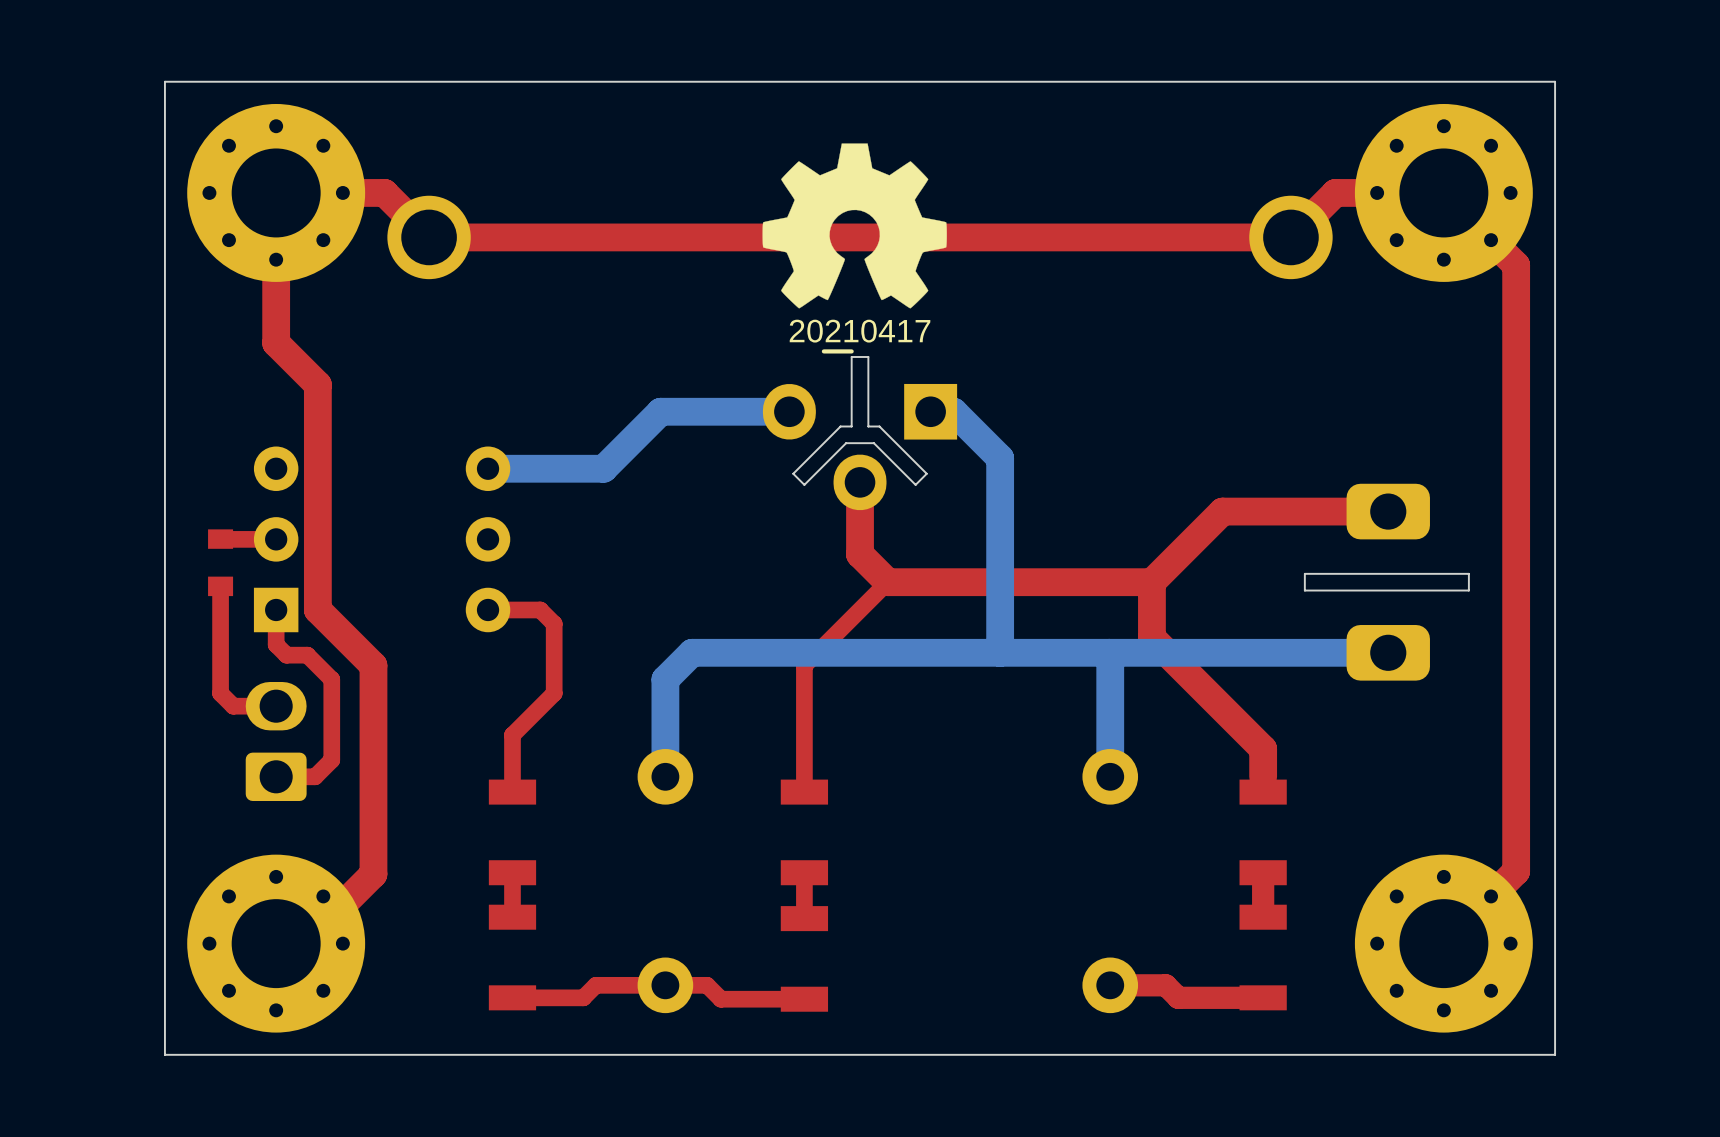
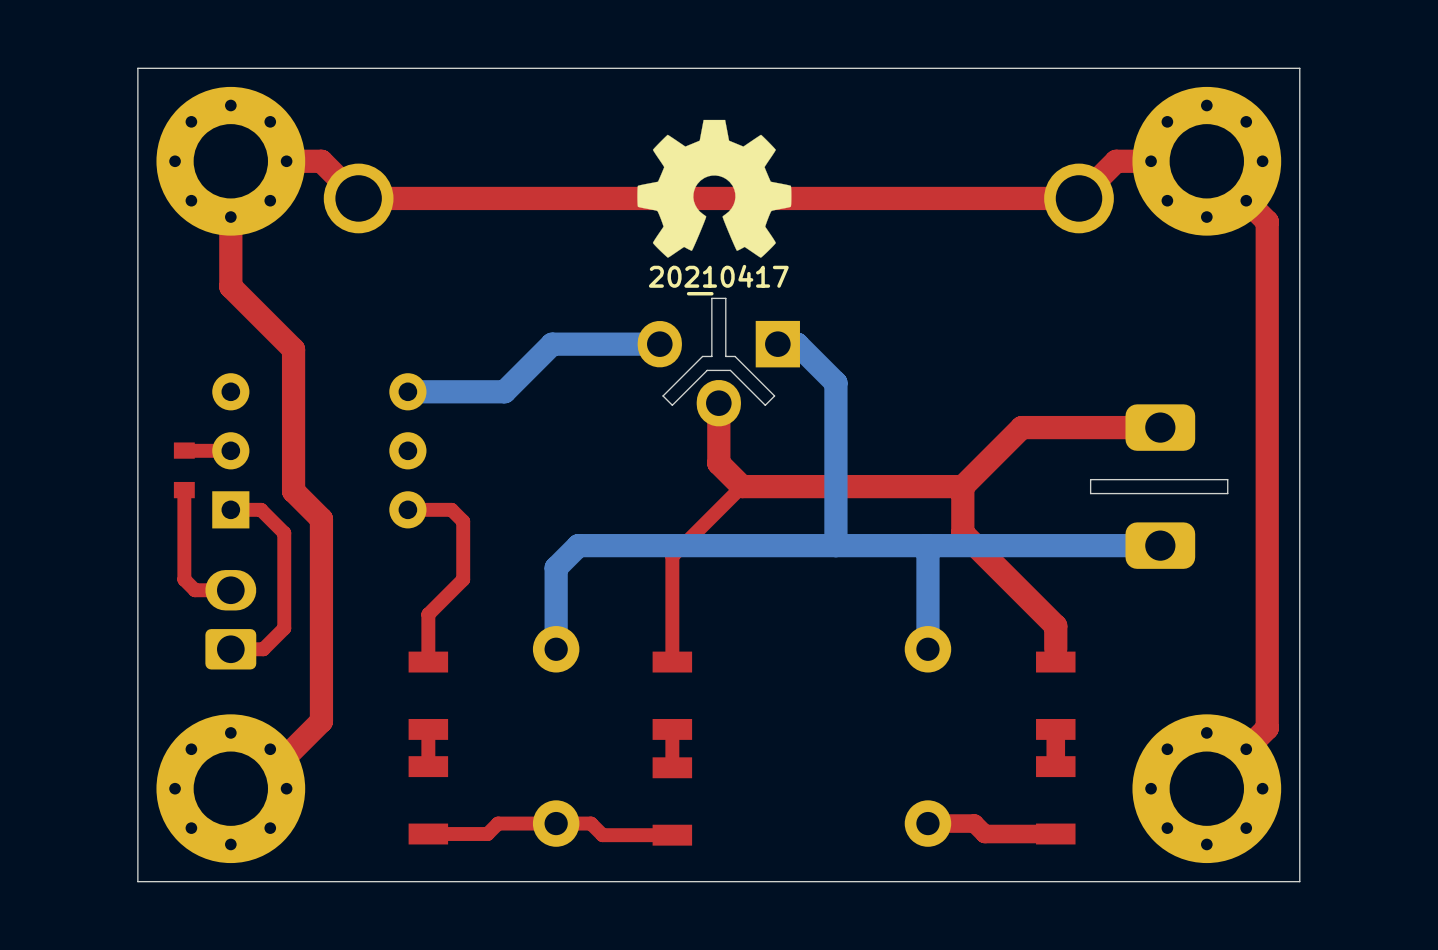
top track: (317, 384) (317, 609) (373, 665) (373, 874) -> (265, 321) (293, 349) (293, 491) (321, 519) (321, 721) (312, 730)
top track: (276, 609) (276, 644) (286, 655) (307, 655) (331, 679) (331, 760) -> (230, 509) (261, 509) (284, 533) (284, 628) (277, 635)

